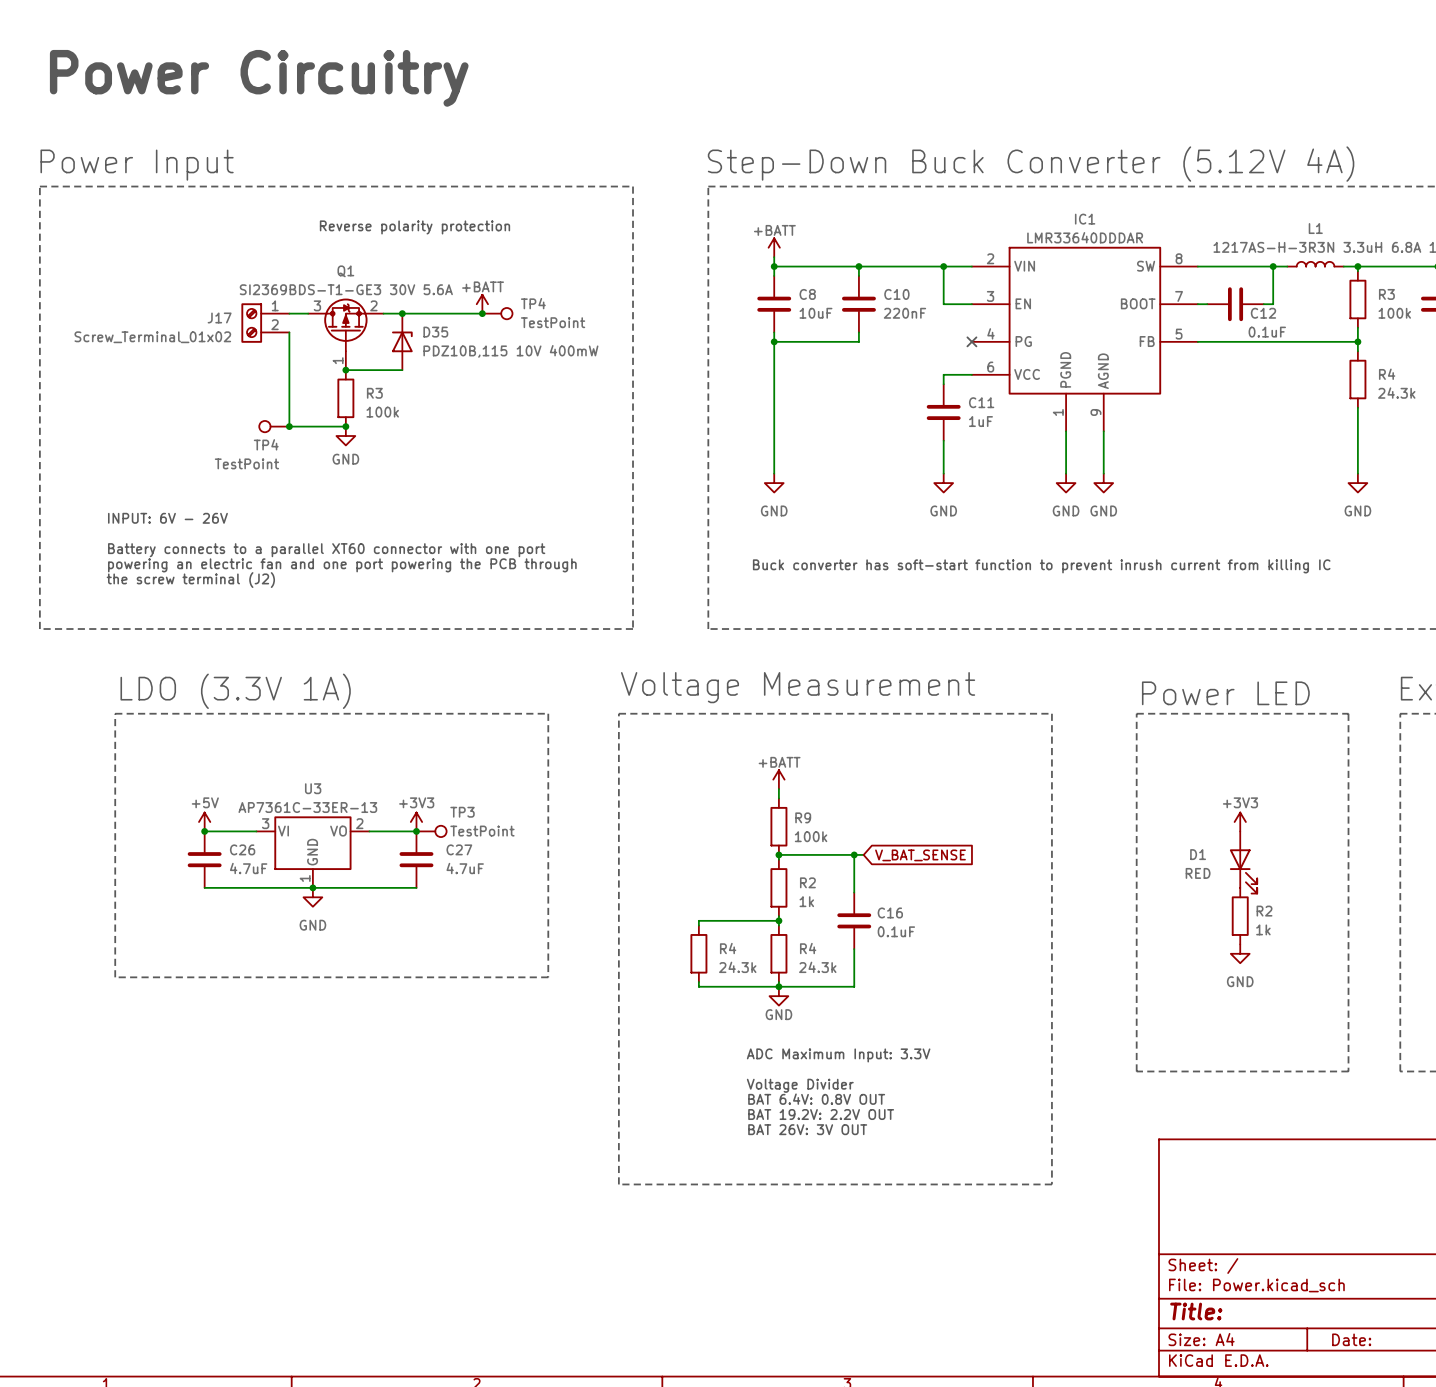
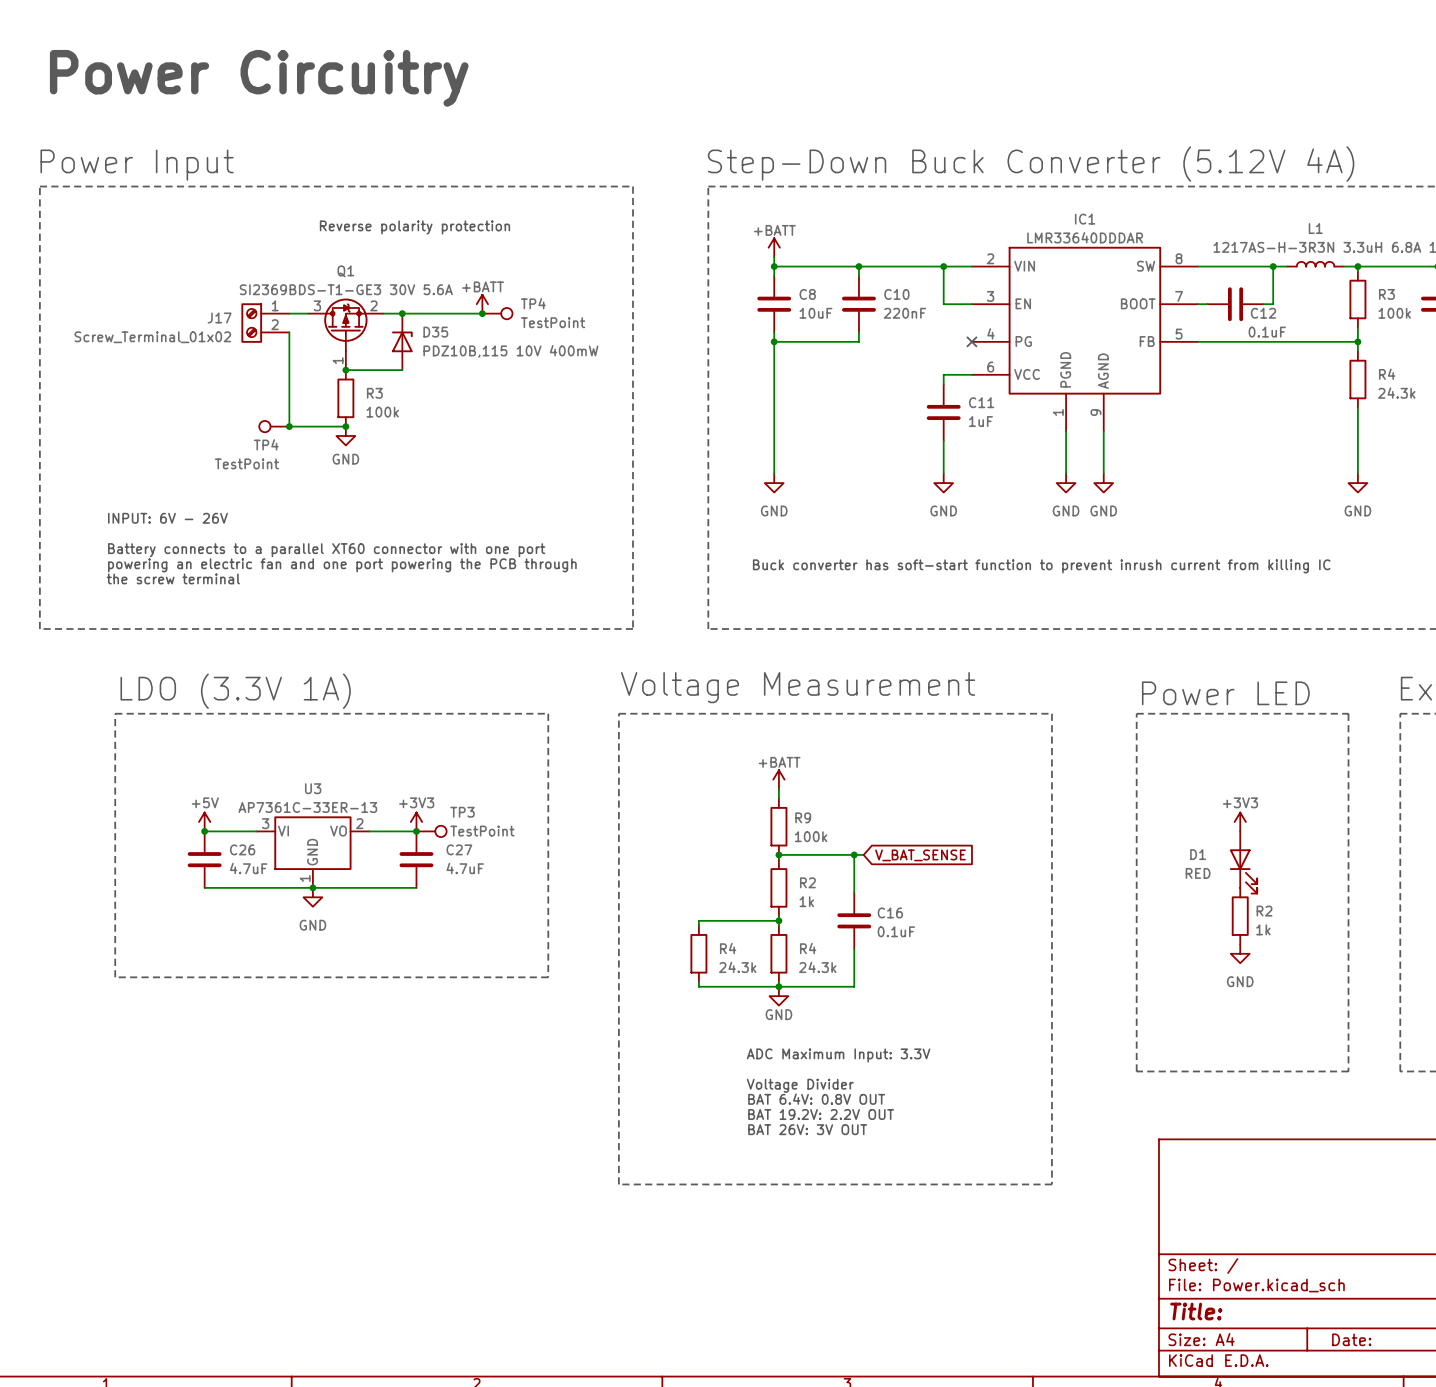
text: the screw terminal (J2) (190, 580) -> the screw terminal (173, 578)

